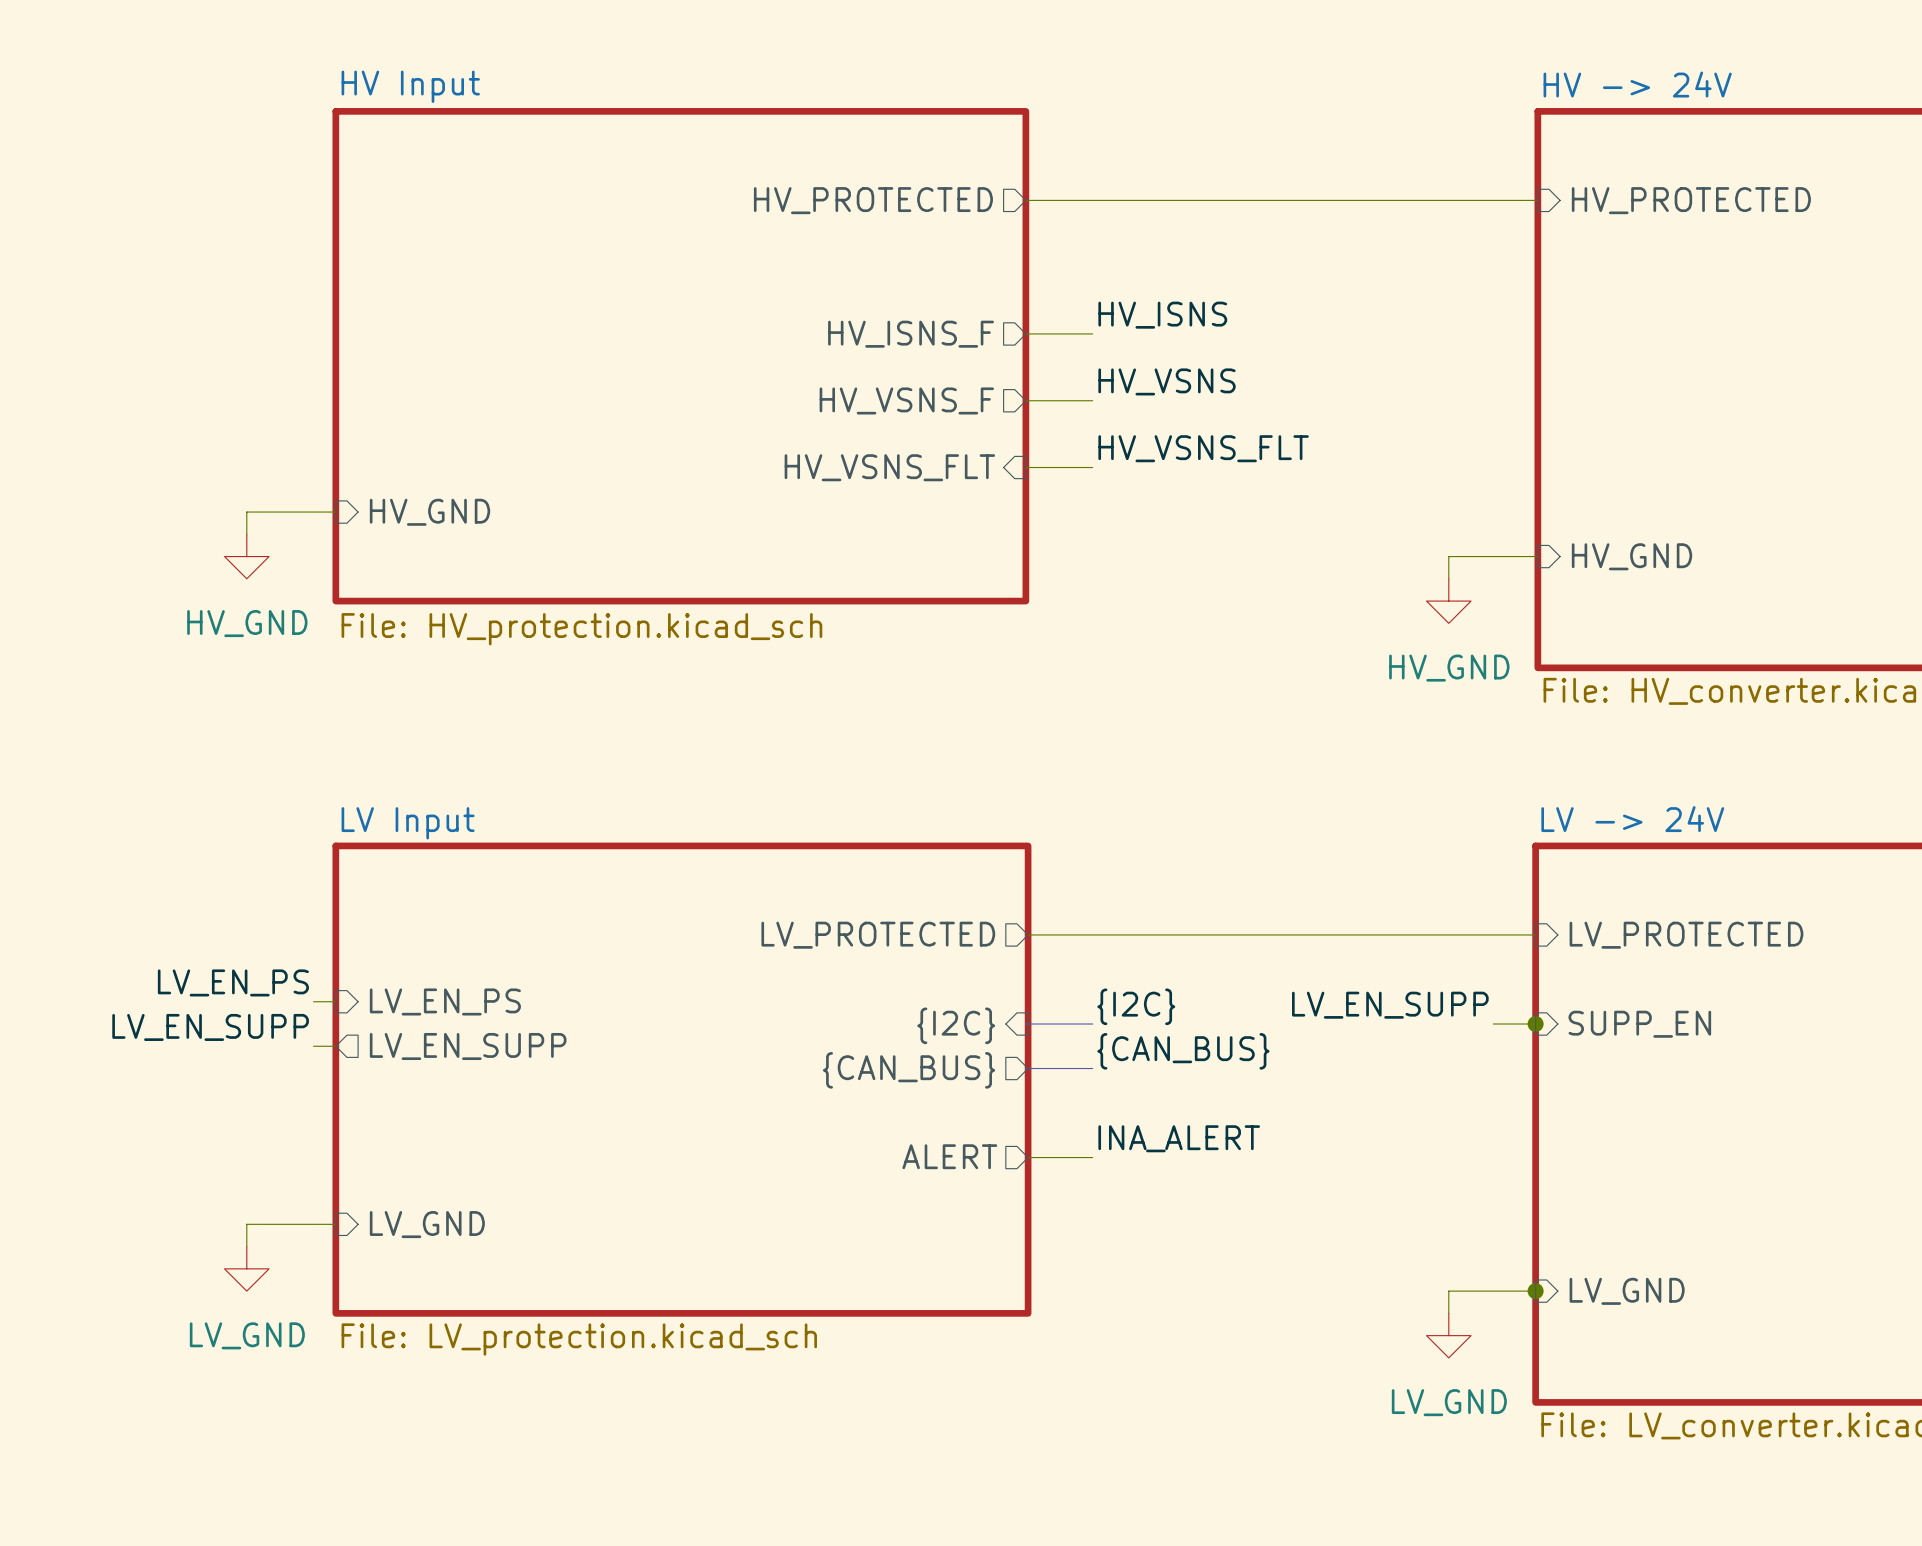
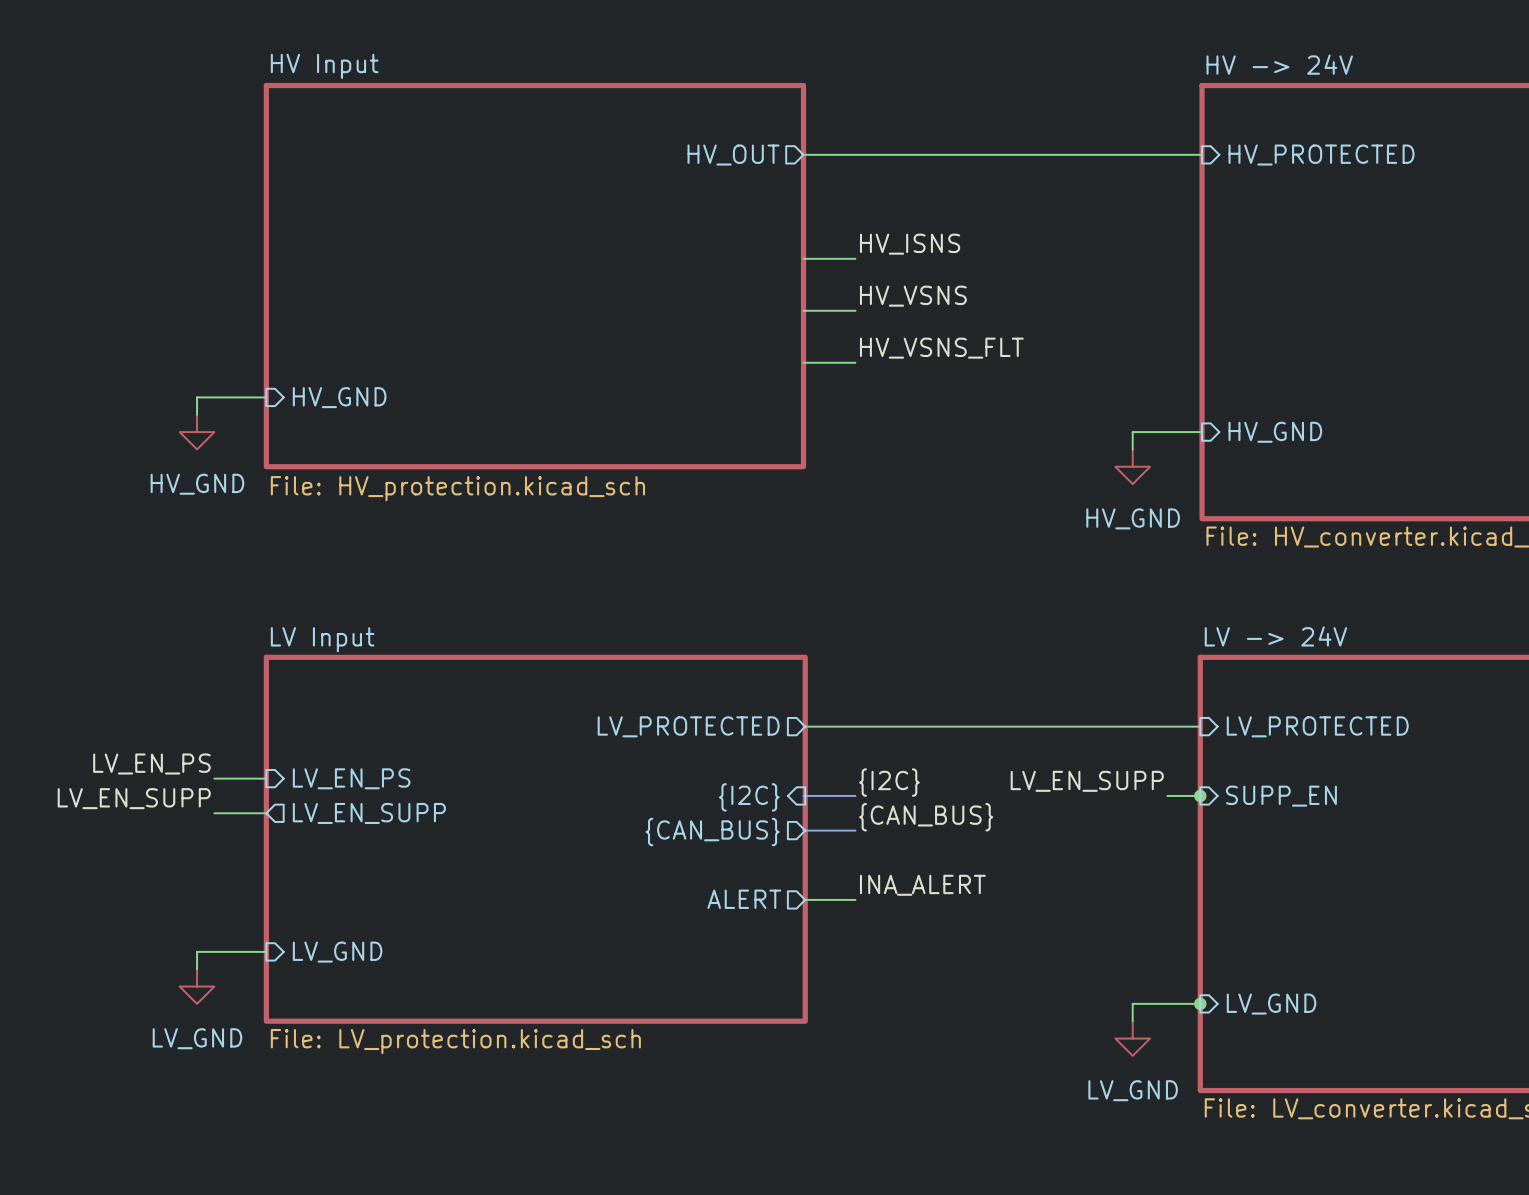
sheet pin: HV_PROTECTED (873, 200) -> HV_OUT (733, 155)
sheet pin: HV_ISNS_F (911, 334) -> none
sheet pin: HV_VSNS_F (906, 400) -> none
sheet pin: HV_VSNS_FLT (889, 467) -> none
label position: LV_EN_PS (233, 982) -> LV_EN_PS (151, 763)
wire: none -> (214, 778) (249, 778)
label position: LV_EN_SUPP (210, 1027) -> LV_EN_SUPP (134, 798)
wire: none -> (214, 813) (249, 813)

